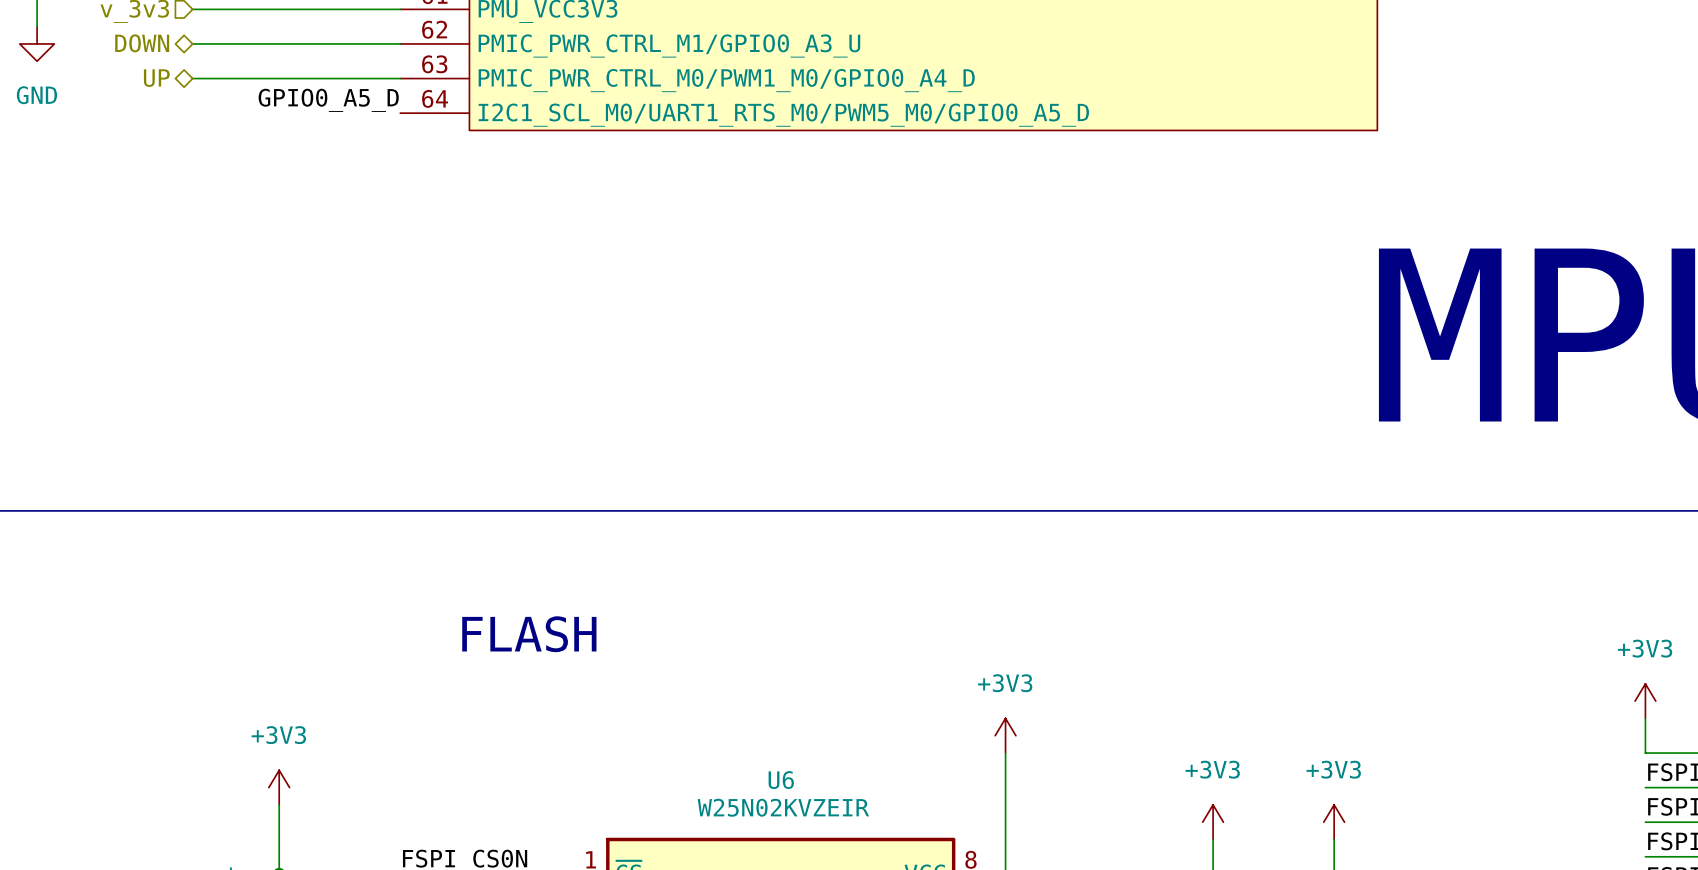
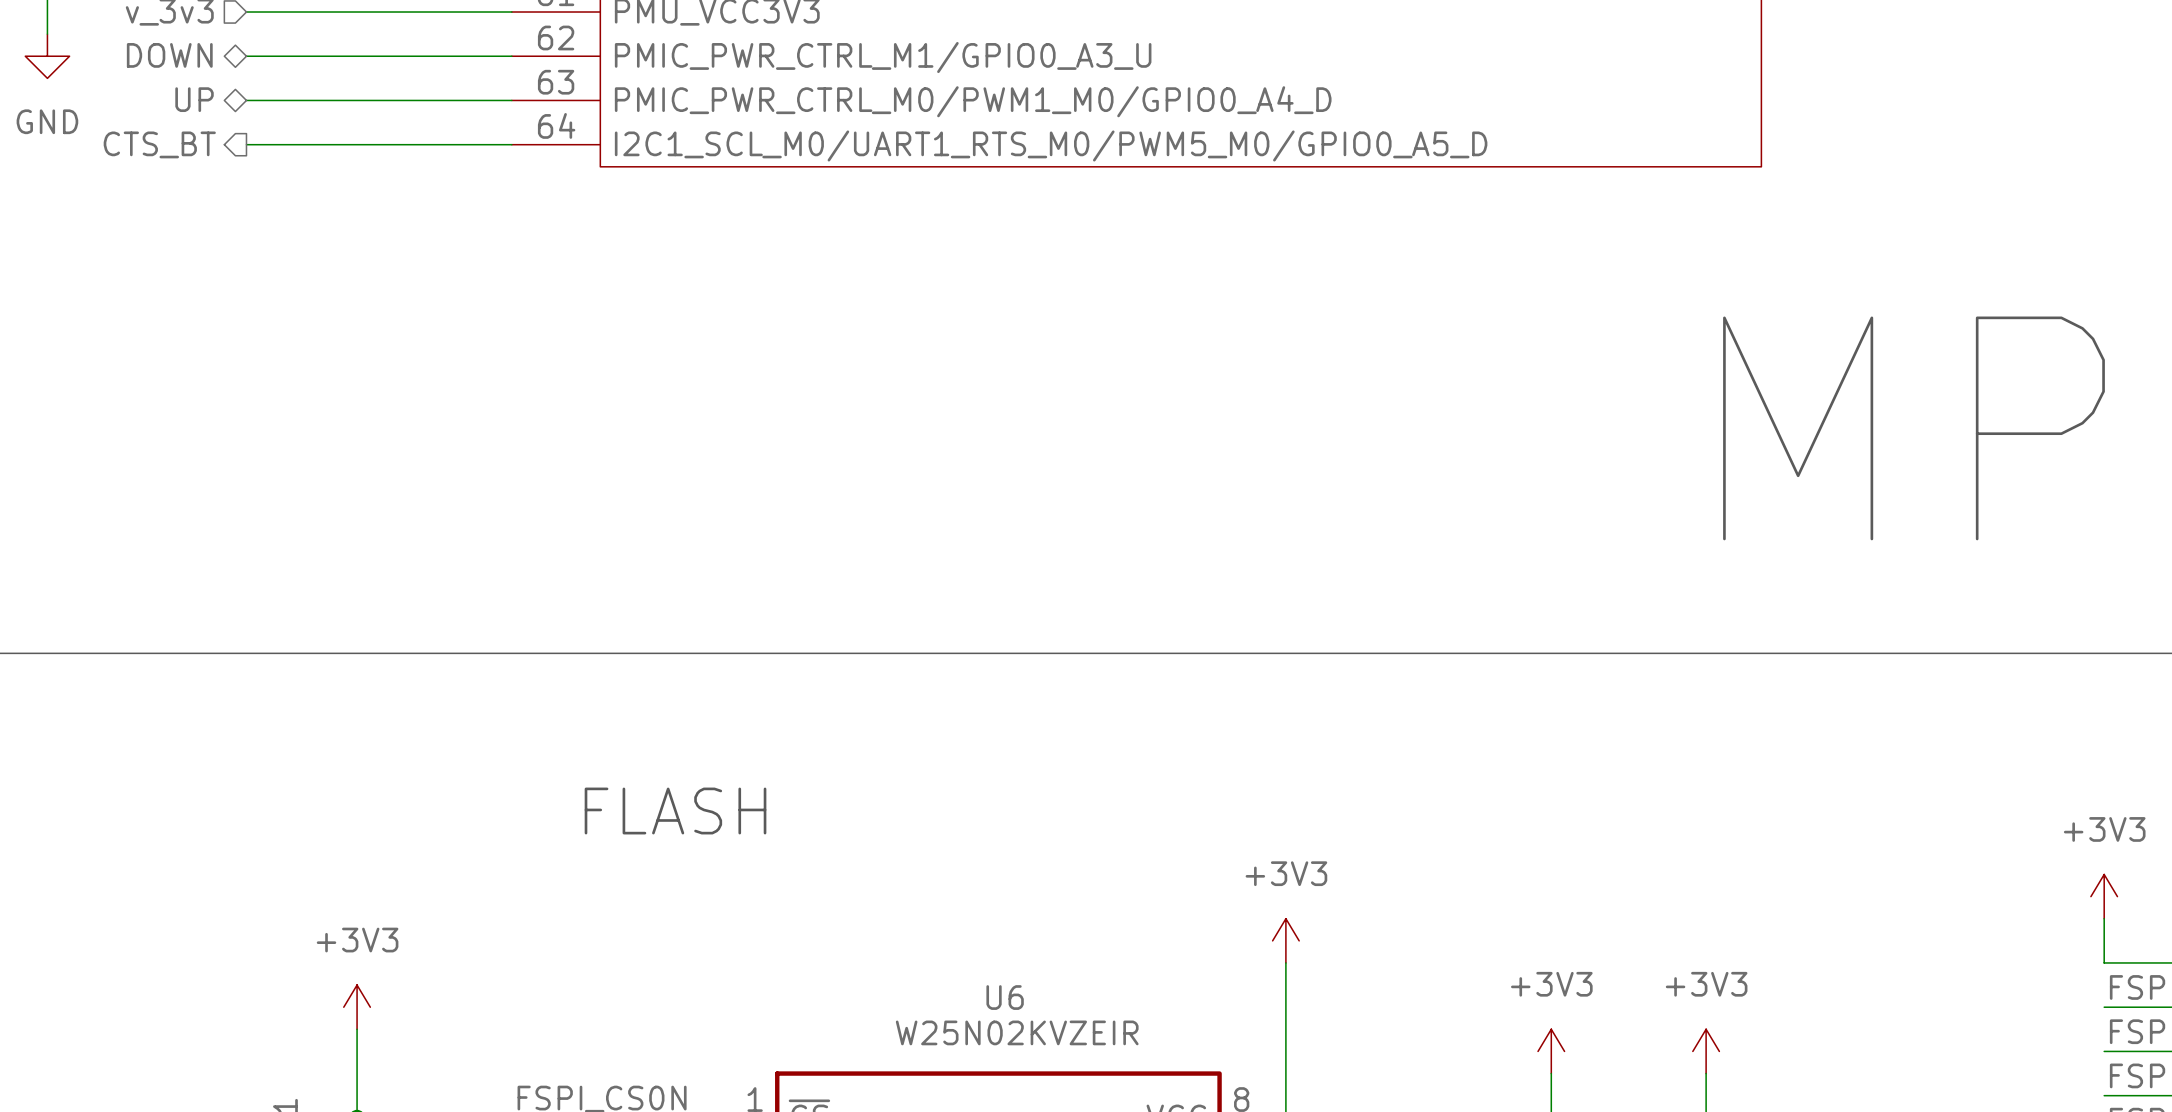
label: GPIO0_A5_D (328, 100) -> none
wire: none -> (246, 144) (511, 144)
hierarchical label: none -> CTS_BT (159, 144)

